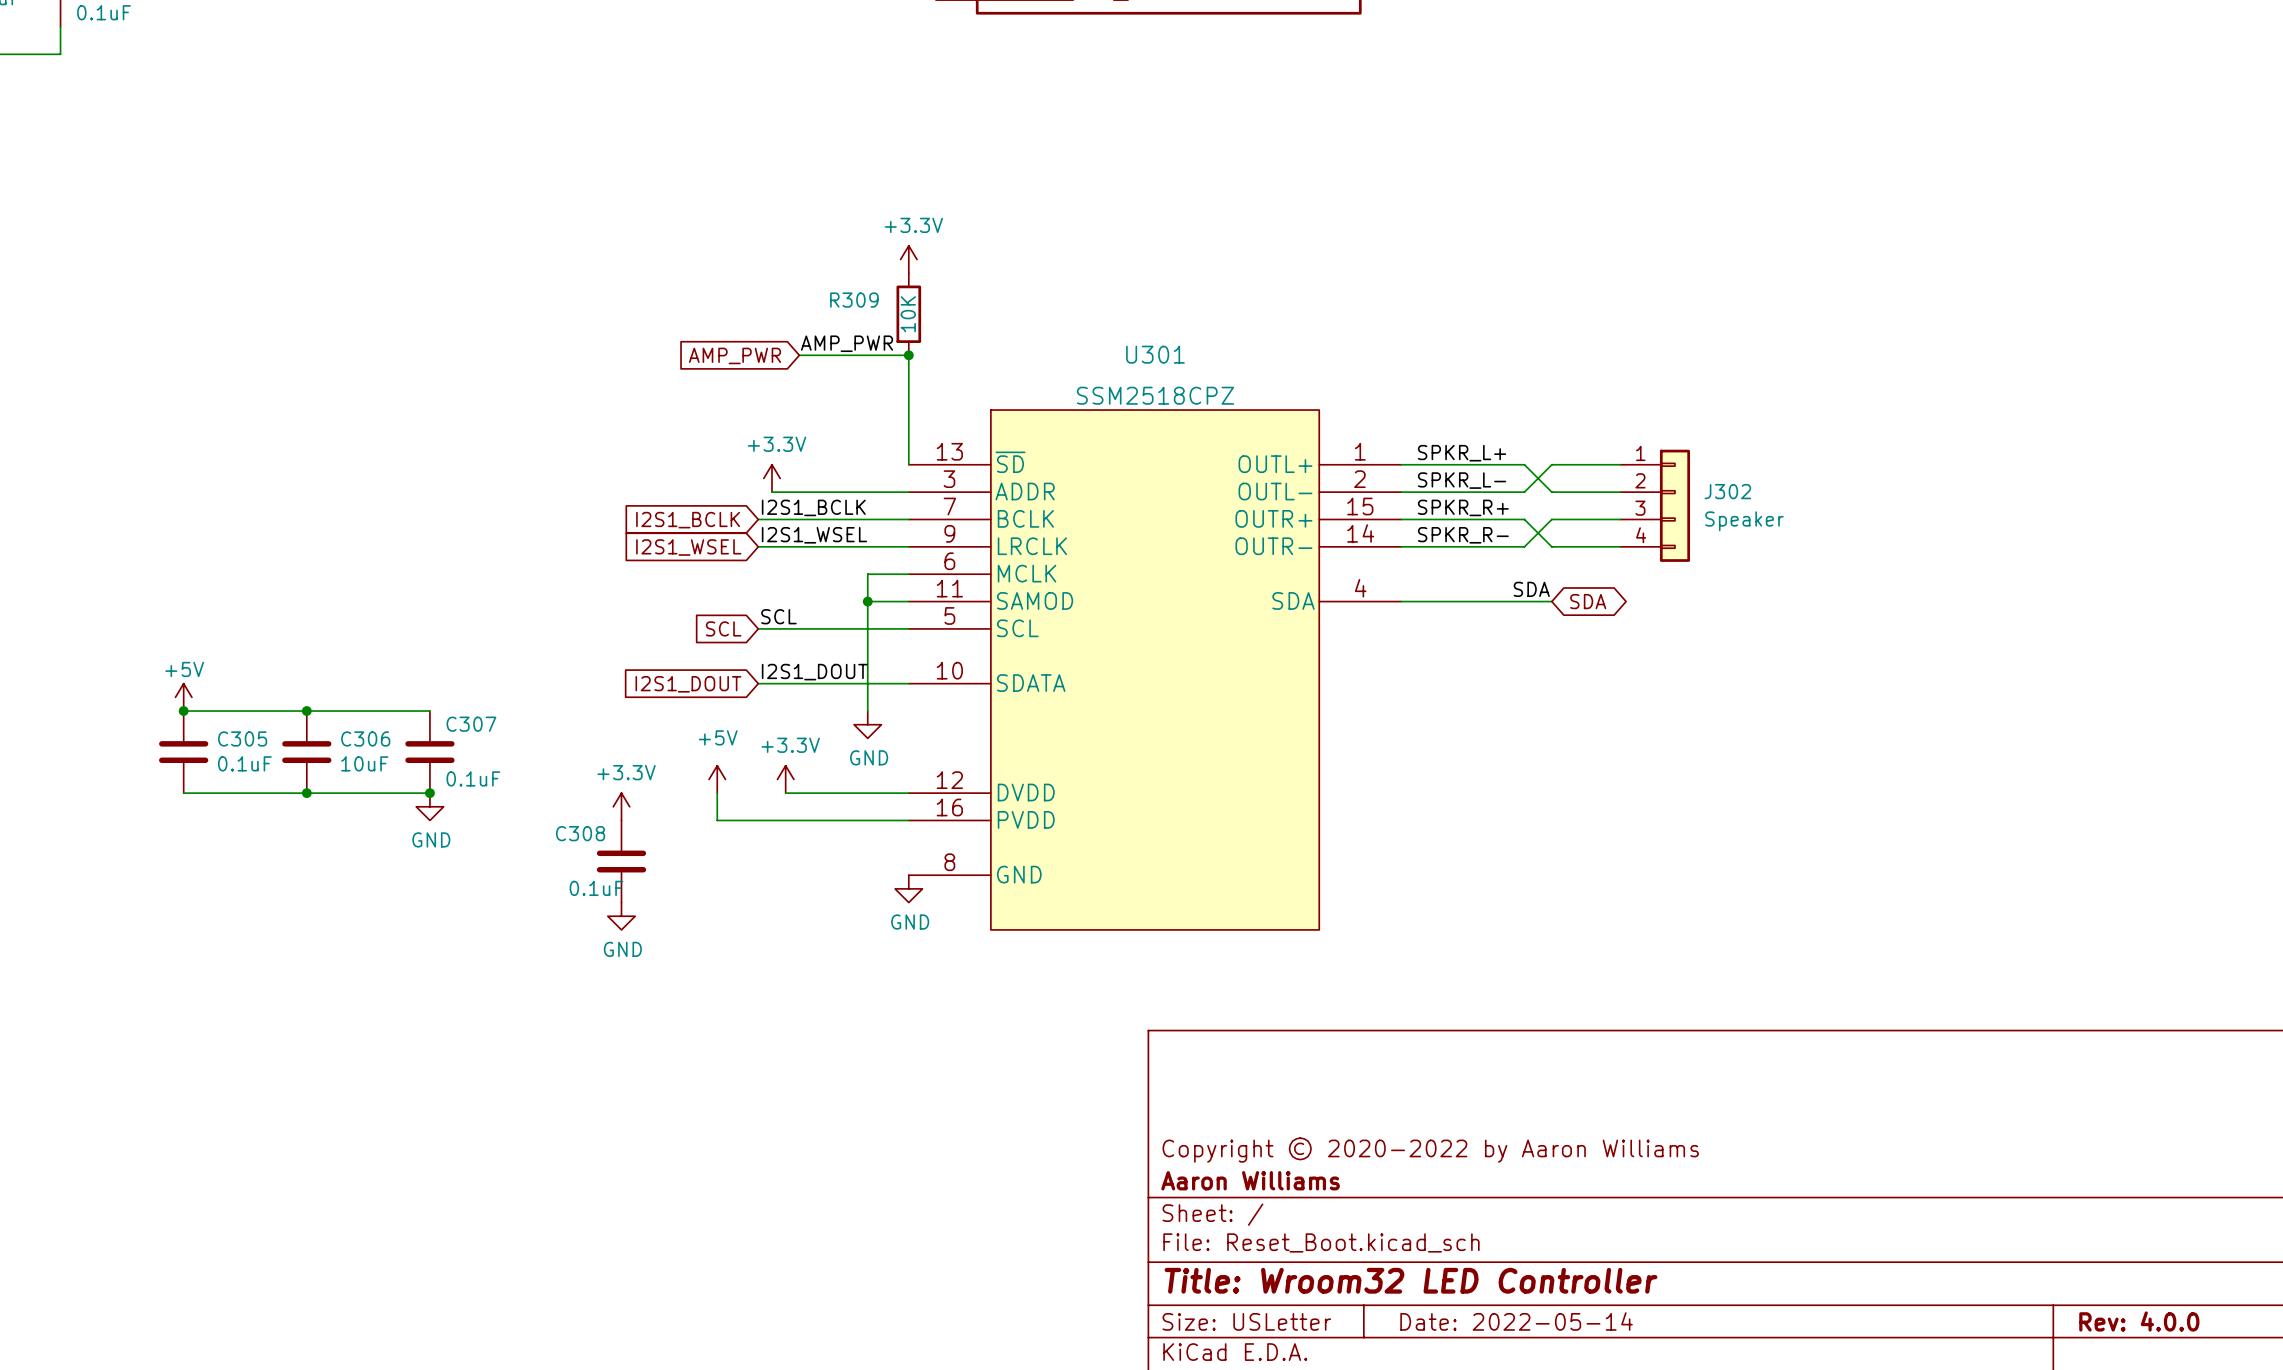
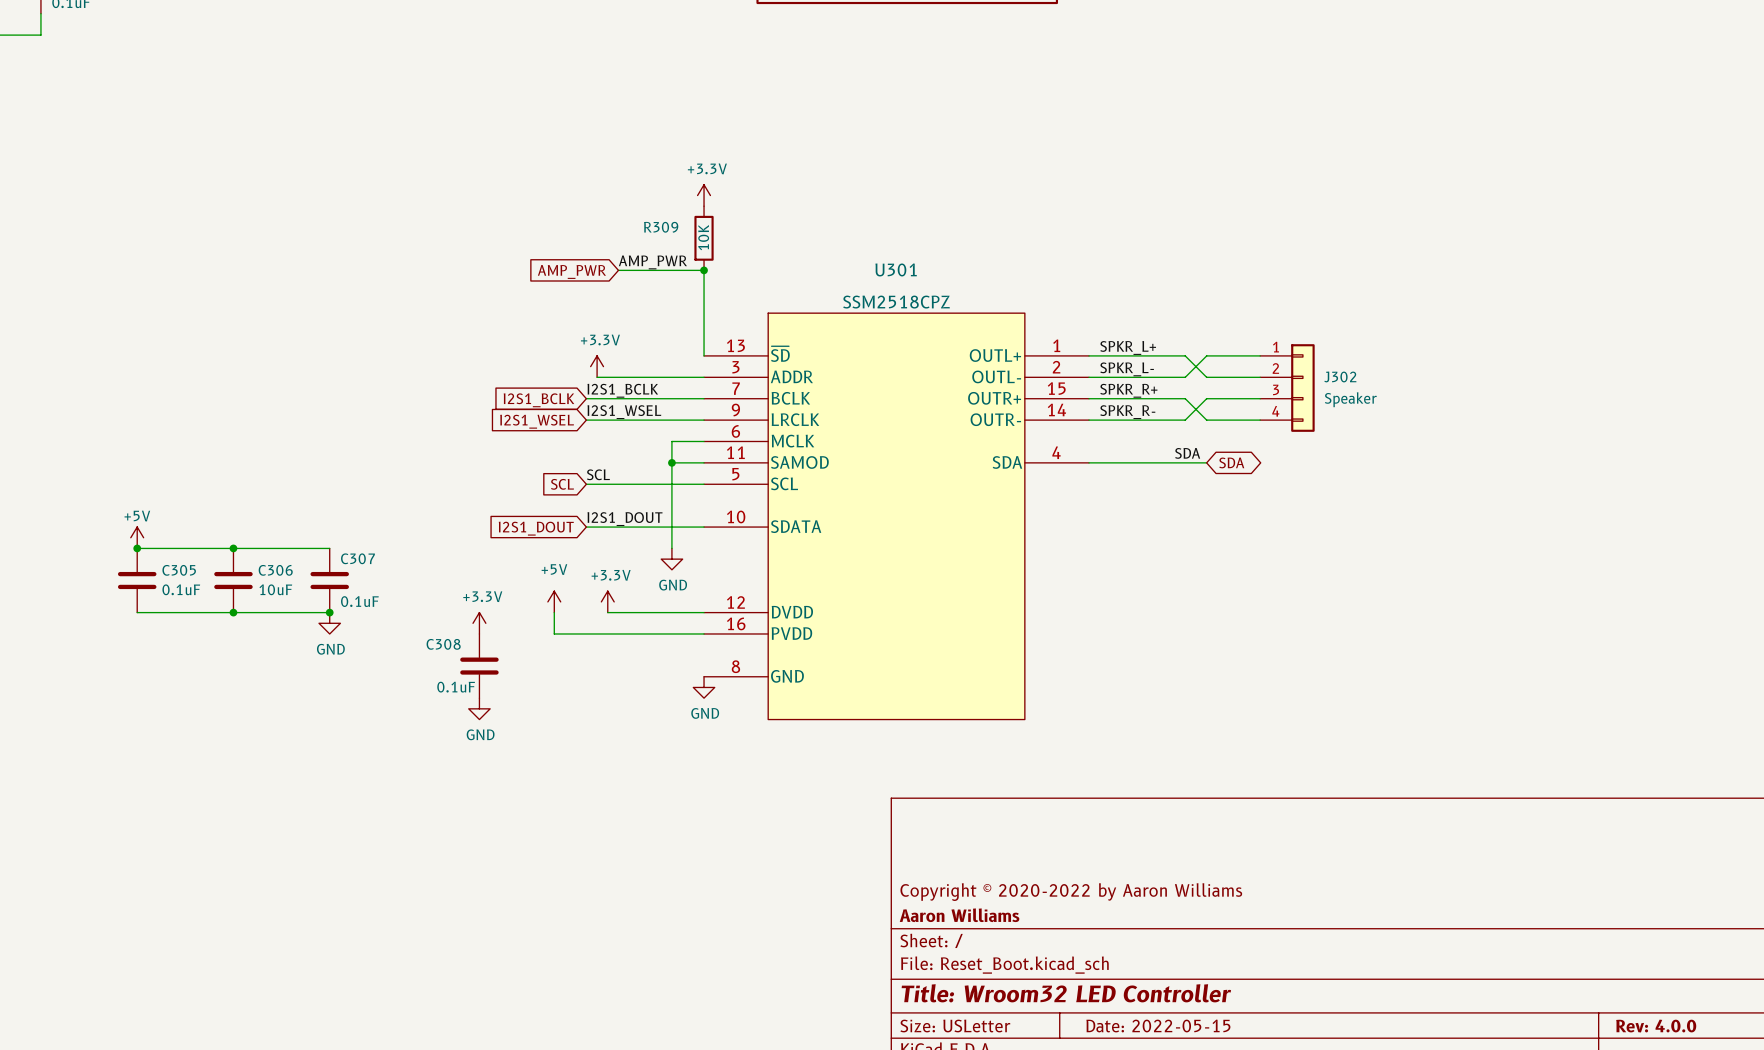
title block: Date: 2022-05-14 (1516, 1321) -> Date: 2022-05-15 (1158, 1026)

